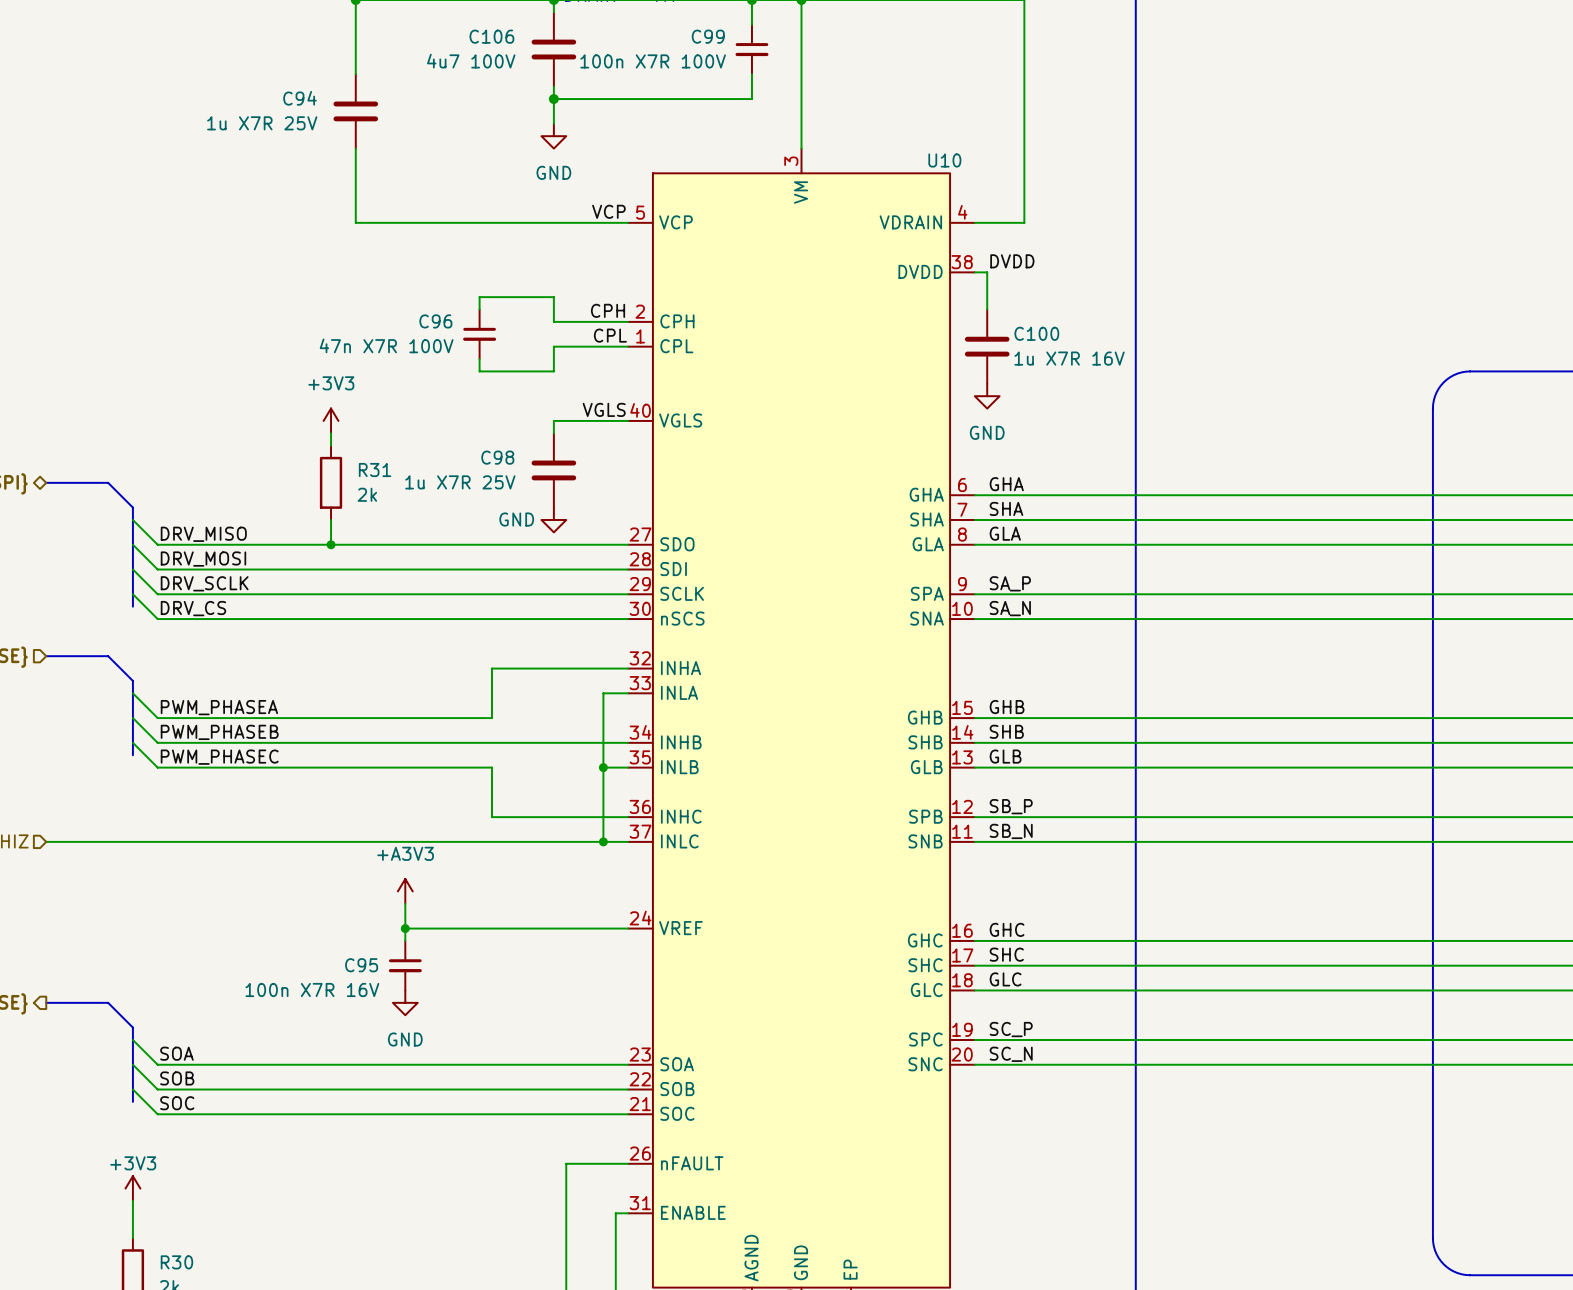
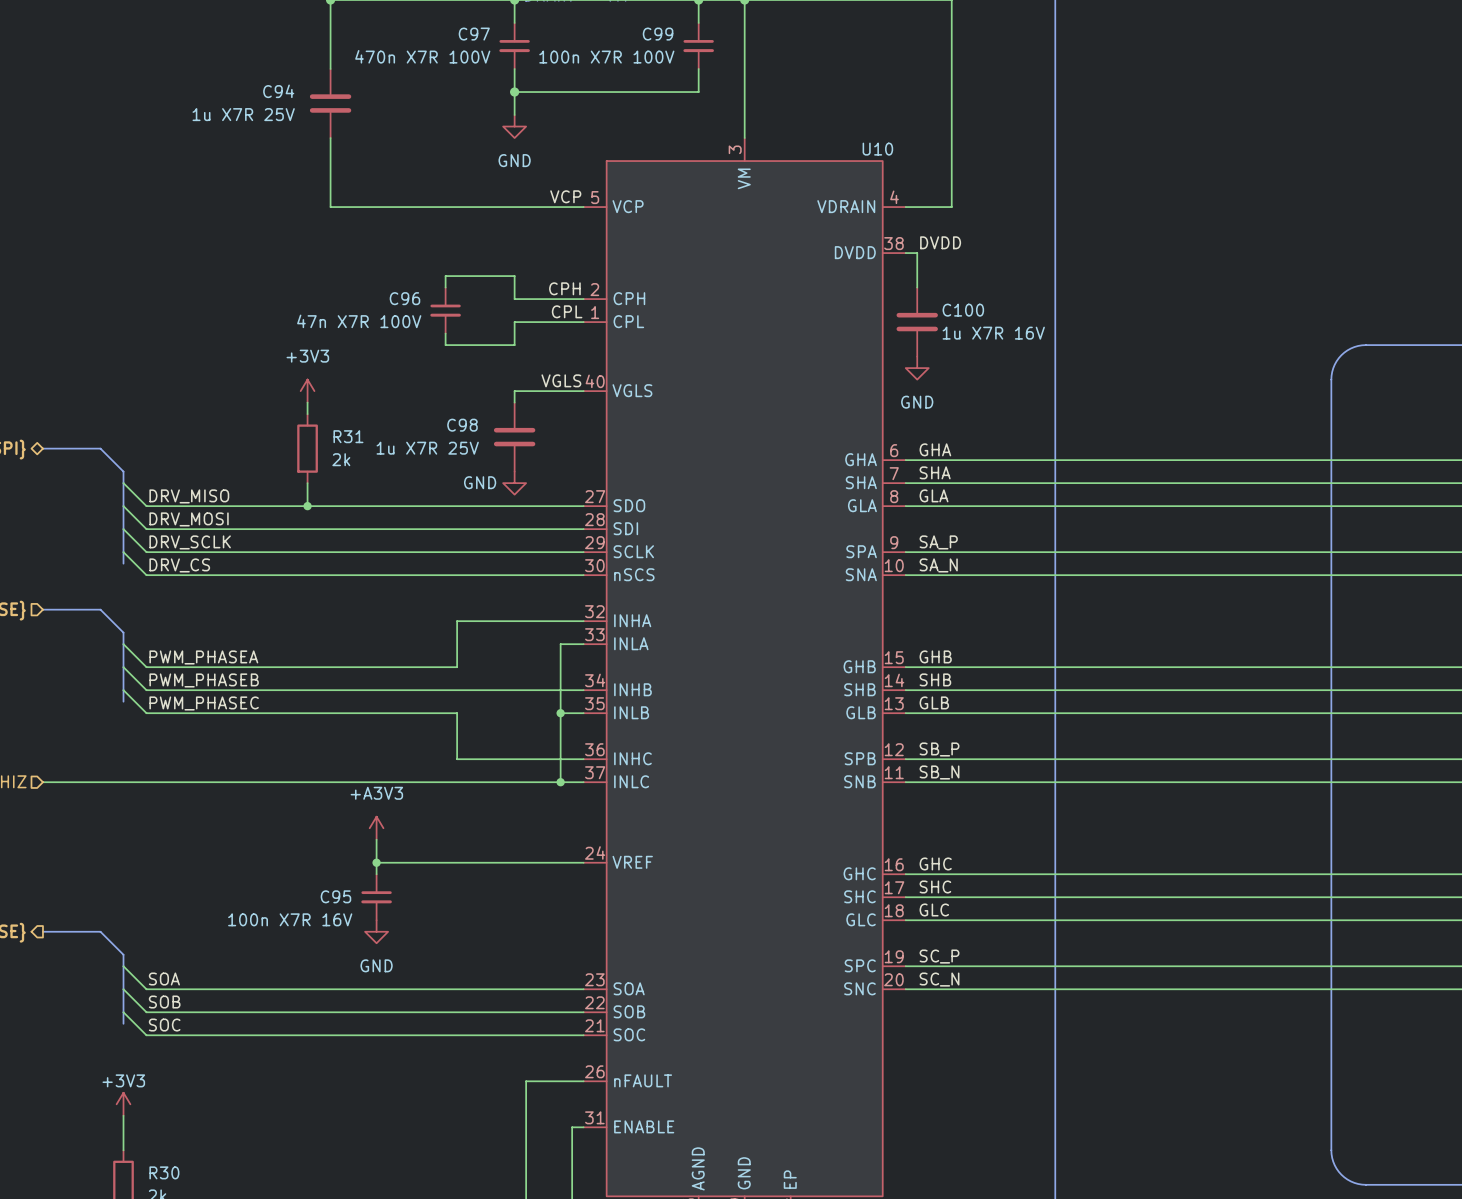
C106: 4u7 100V (553, 49) -> none
C97: none -> 470n X7R 100V (514, 46)

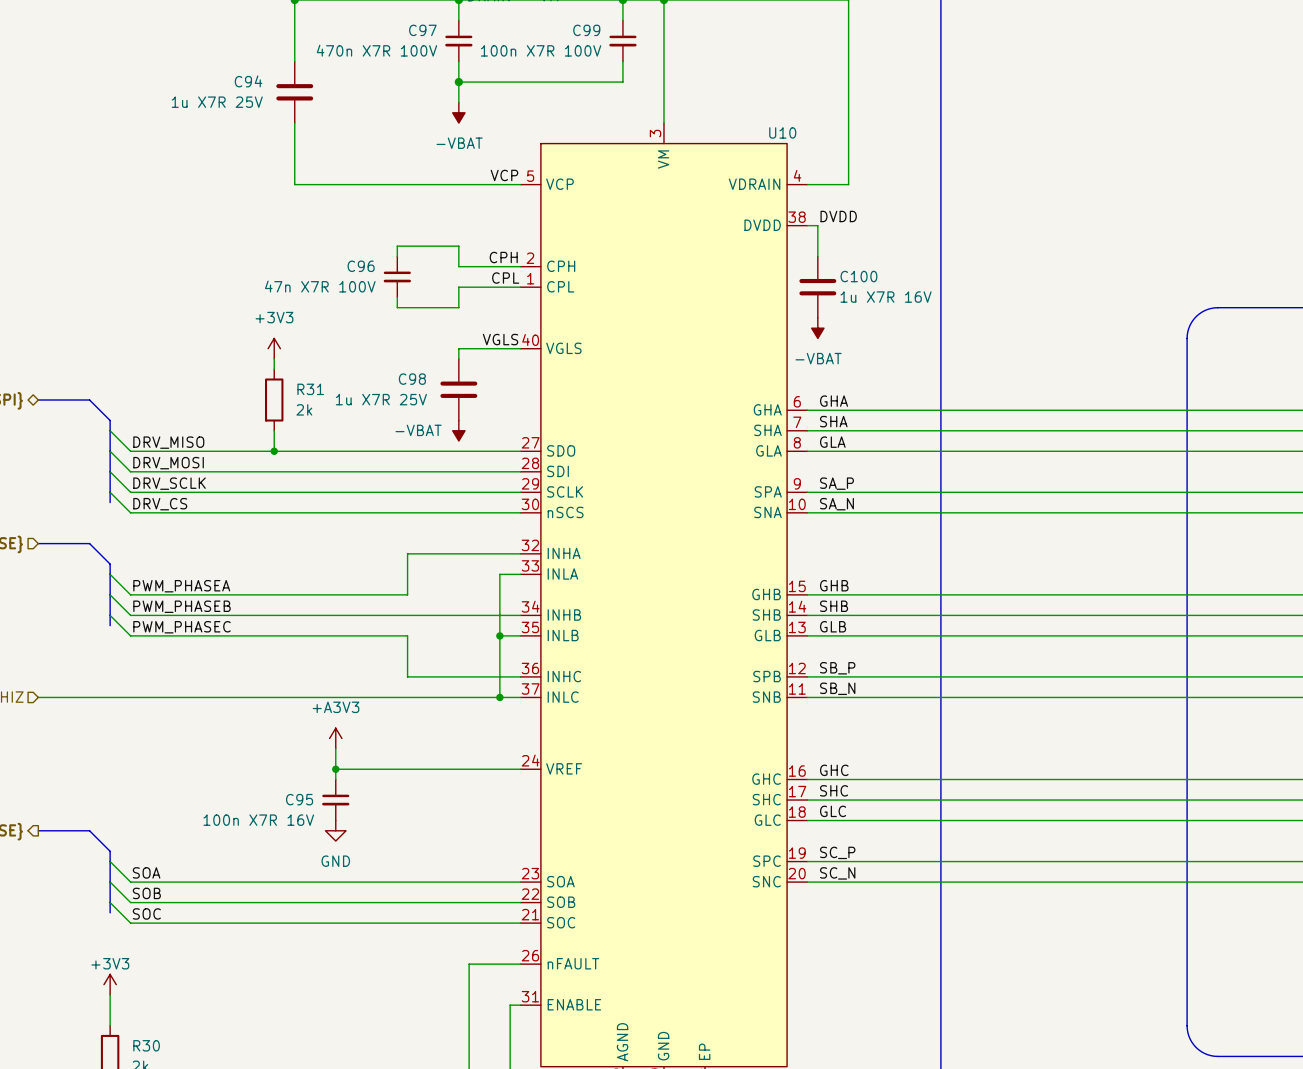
power symbol: GND (514, 126) -> -VBAT (458, 112)
power symbol: GND (917, 368) -> -VBAT (817, 328)
power symbol: GND (514, 483) -> -VBAT (458, 430)

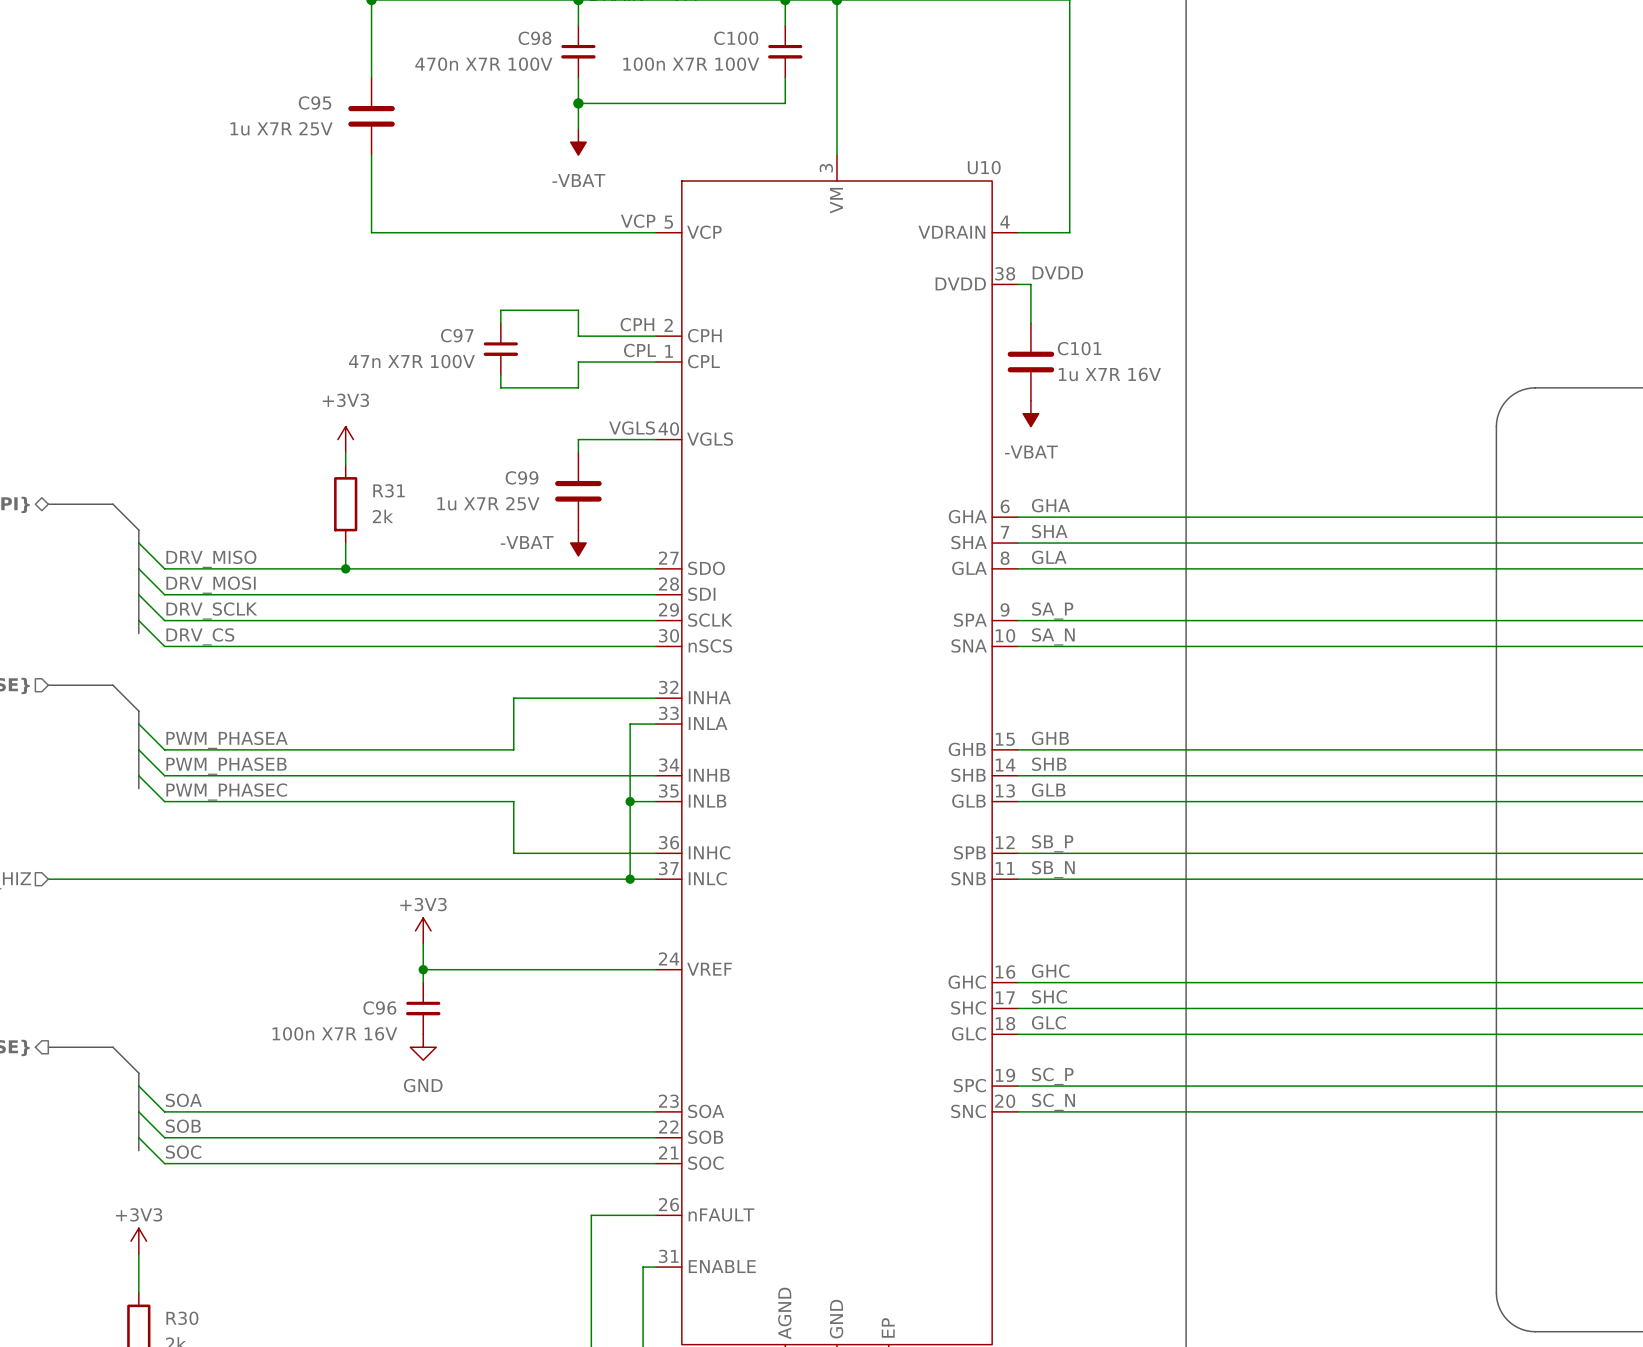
C97 name: C97 (422, 30) -> C98 (534, 38)
C99 name: C99 (586, 30) -> C100 (736, 38)
C94 name: C94 (248, 81) -> C95 (315, 102)
C96 name: C96 (361, 266) -> C97 (457, 335)
C100 name: C100 (858, 276) -> C101 (1079, 348)
C98 name: C98 (412, 379) -> C99 (522, 477)
power symbol: +A3V3 (335, 738) -> +3V3 (423, 930)
C95 name: C95 (299, 799) -> C96 (379, 1008)

